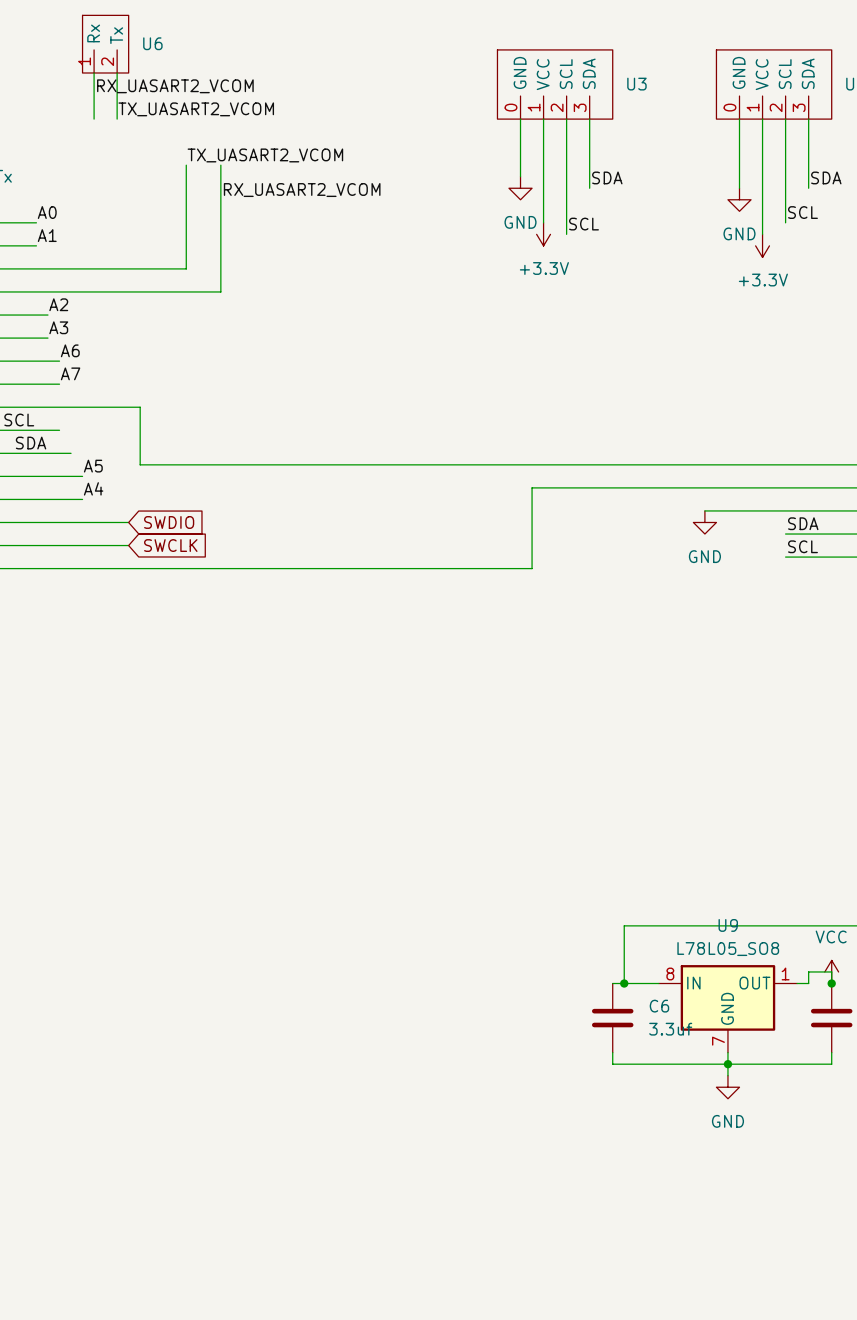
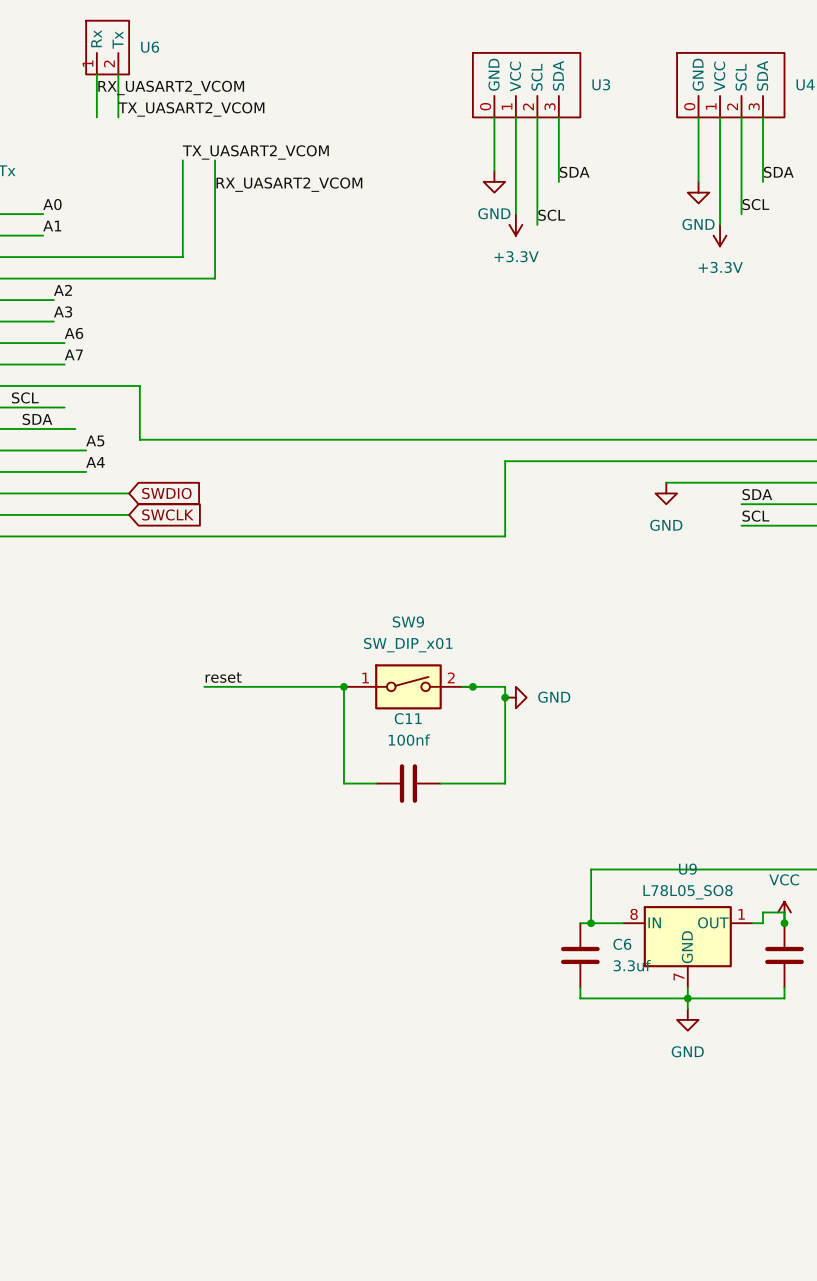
label: none -> reset (223, 677)
wire: none -> (204, 686) (343, 686) (343, 783) (376, 783)
junction: none -> (343, 686)
SW9: none -> SW_DIP_x01 (408, 686)
wire: none -> (462, 686) (505, 686) (505, 783) (440, 783)
junction: none -> (472, 686)
junction: none -> (505, 697)
power symbol: none -> GND (515, 697)
C11: none -> 100nf (408, 783)

